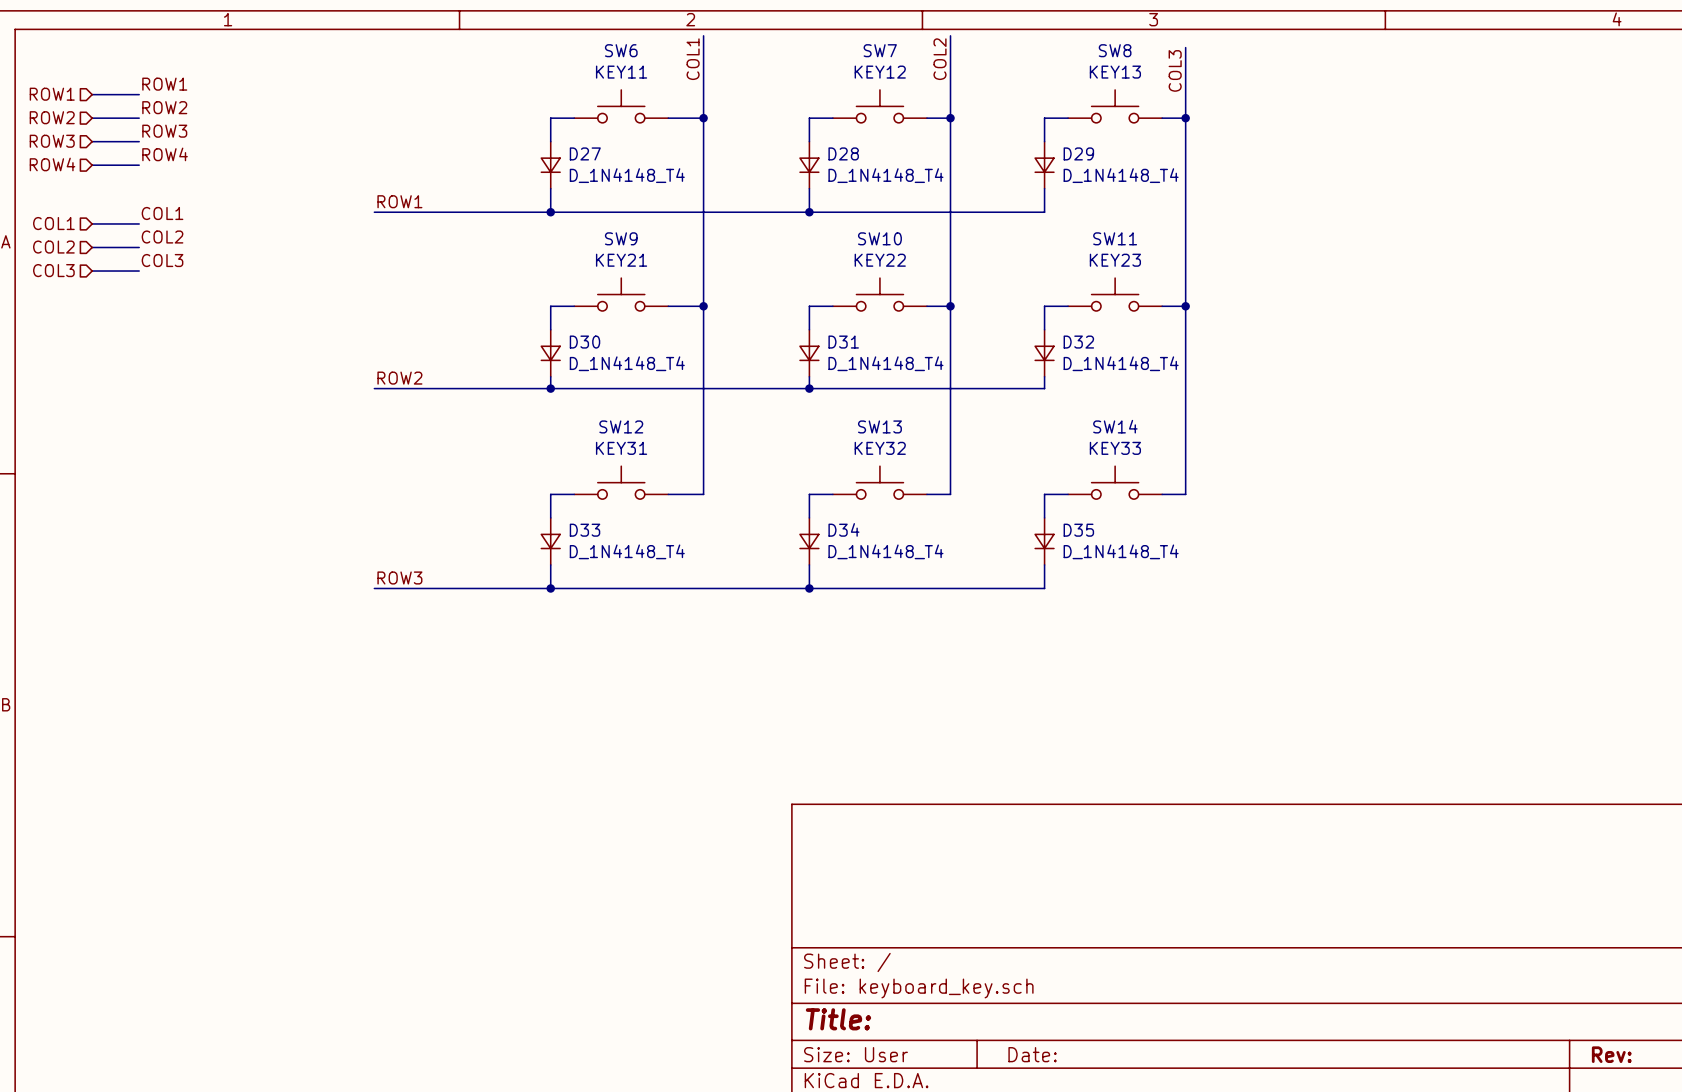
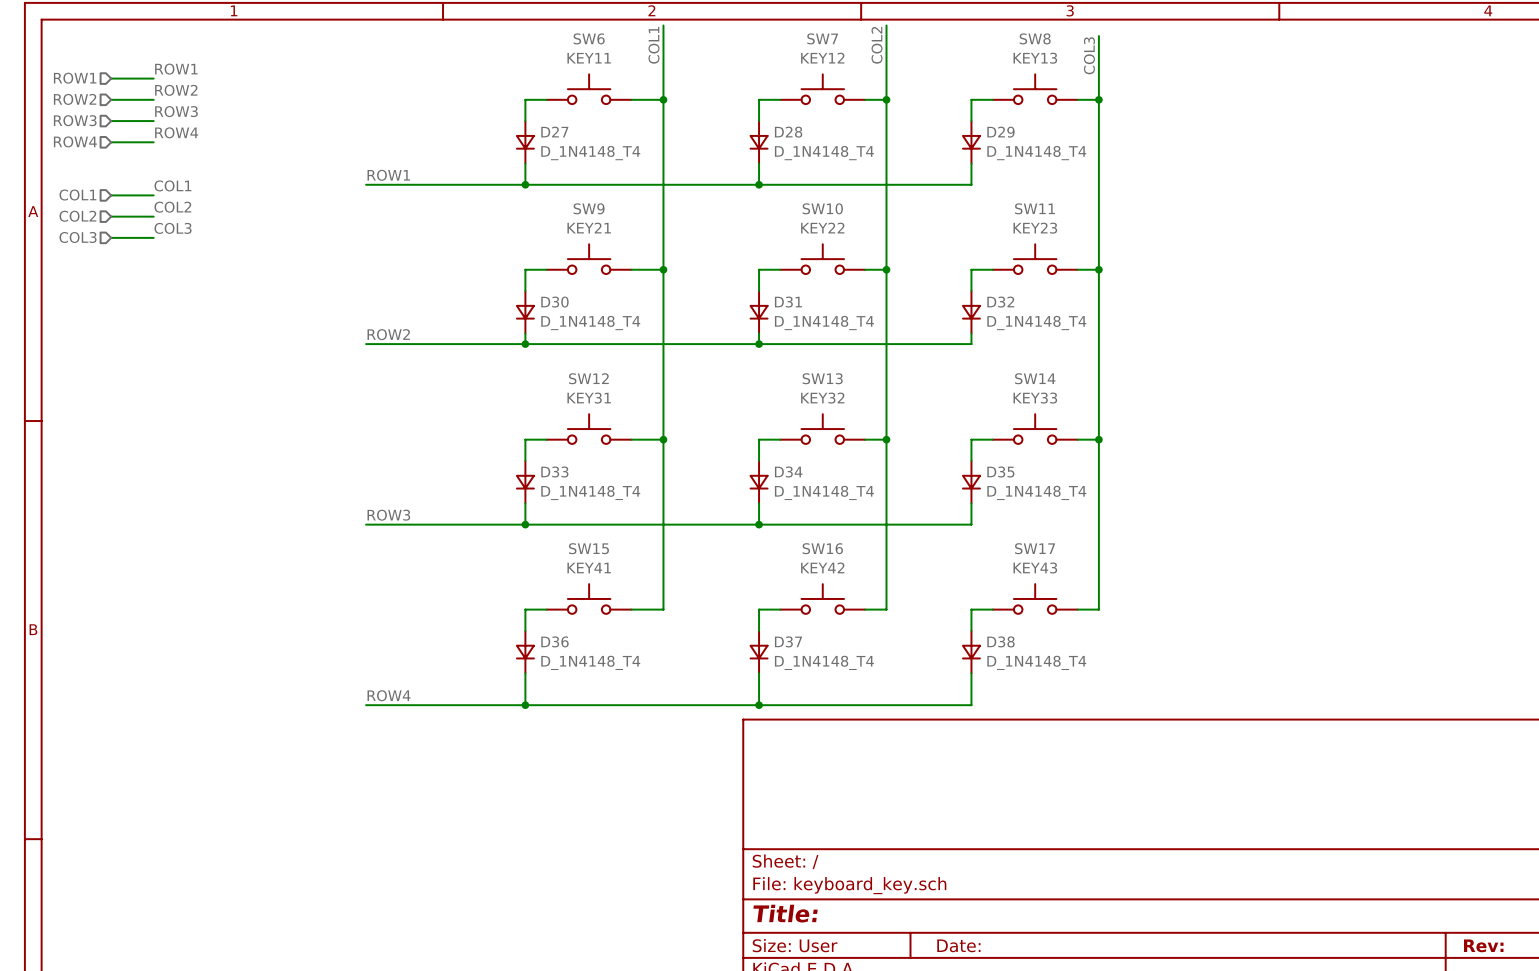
wire: none -> (663, 439) (663, 609) (631, 609)
junction: none -> (663, 439)
wire: none -> (886, 439) (886, 609) (865, 609)
junction: none -> (886, 439)
wire: none -> (1098, 439) (1098, 609) (1077, 609)
junction: none -> (1098, 439)
SW15: none -> KEY41 (589, 598)
SW16: none -> KEY42 (822, 598)
SW17: none -> KEY43 (1035, 598)
wire: none -> (546, 609) (525, 609) (525, 630)
wire: none -> (780, 609) (759, 609) (759, 630)
wire: none -> (992, 609) (971, 609) (971, 630)
D36: none -> D_1N4148_T4 (525, 652)
D37: none -> D_1N4148_T4 (759, 652)
D38: none -> D_1N4148_T4 (971, 652)
wire: none -> (525, 673) (525, 705)
wire: none -> (759, 673) (759, 705)
wire: none -> (971, 673) (971, 705) (366, 705)
label: none -> ROW4 (389, 695)
junction: none -> (525, 705)
junction: none -> (759, 705)

